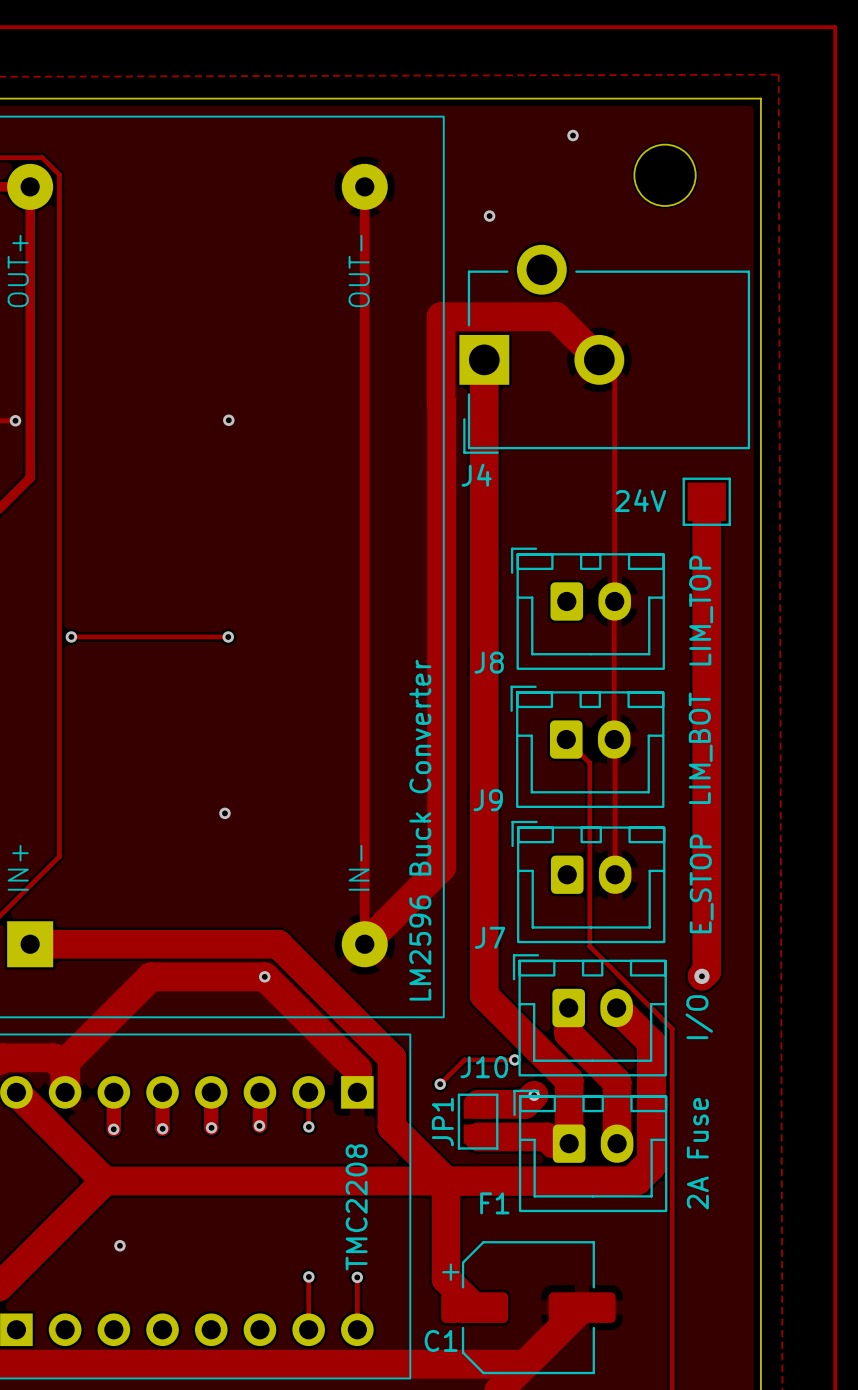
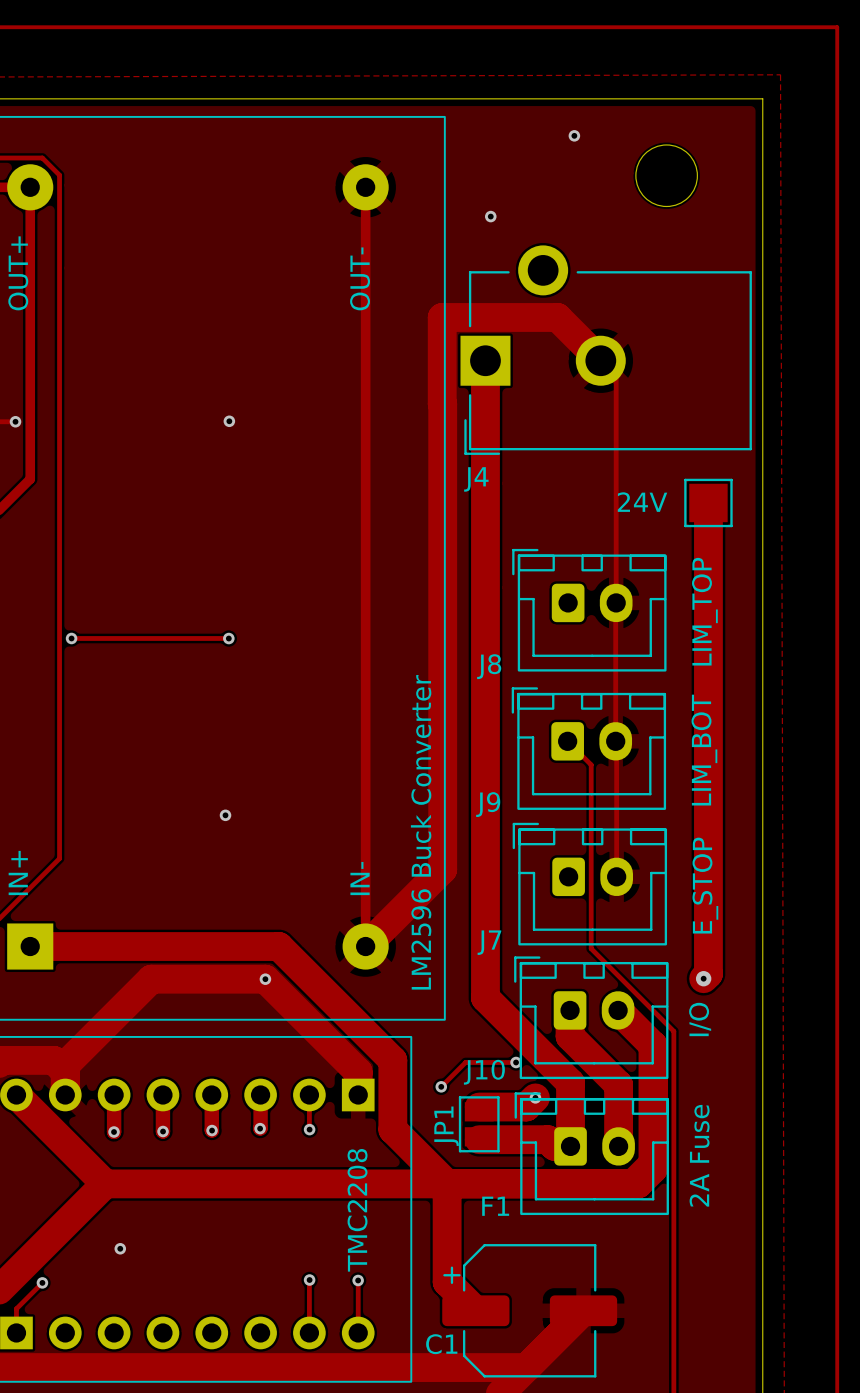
track: none -> (42, 1282) (16, 1308) (16, 1332)
via: none -> (42, 1282)

